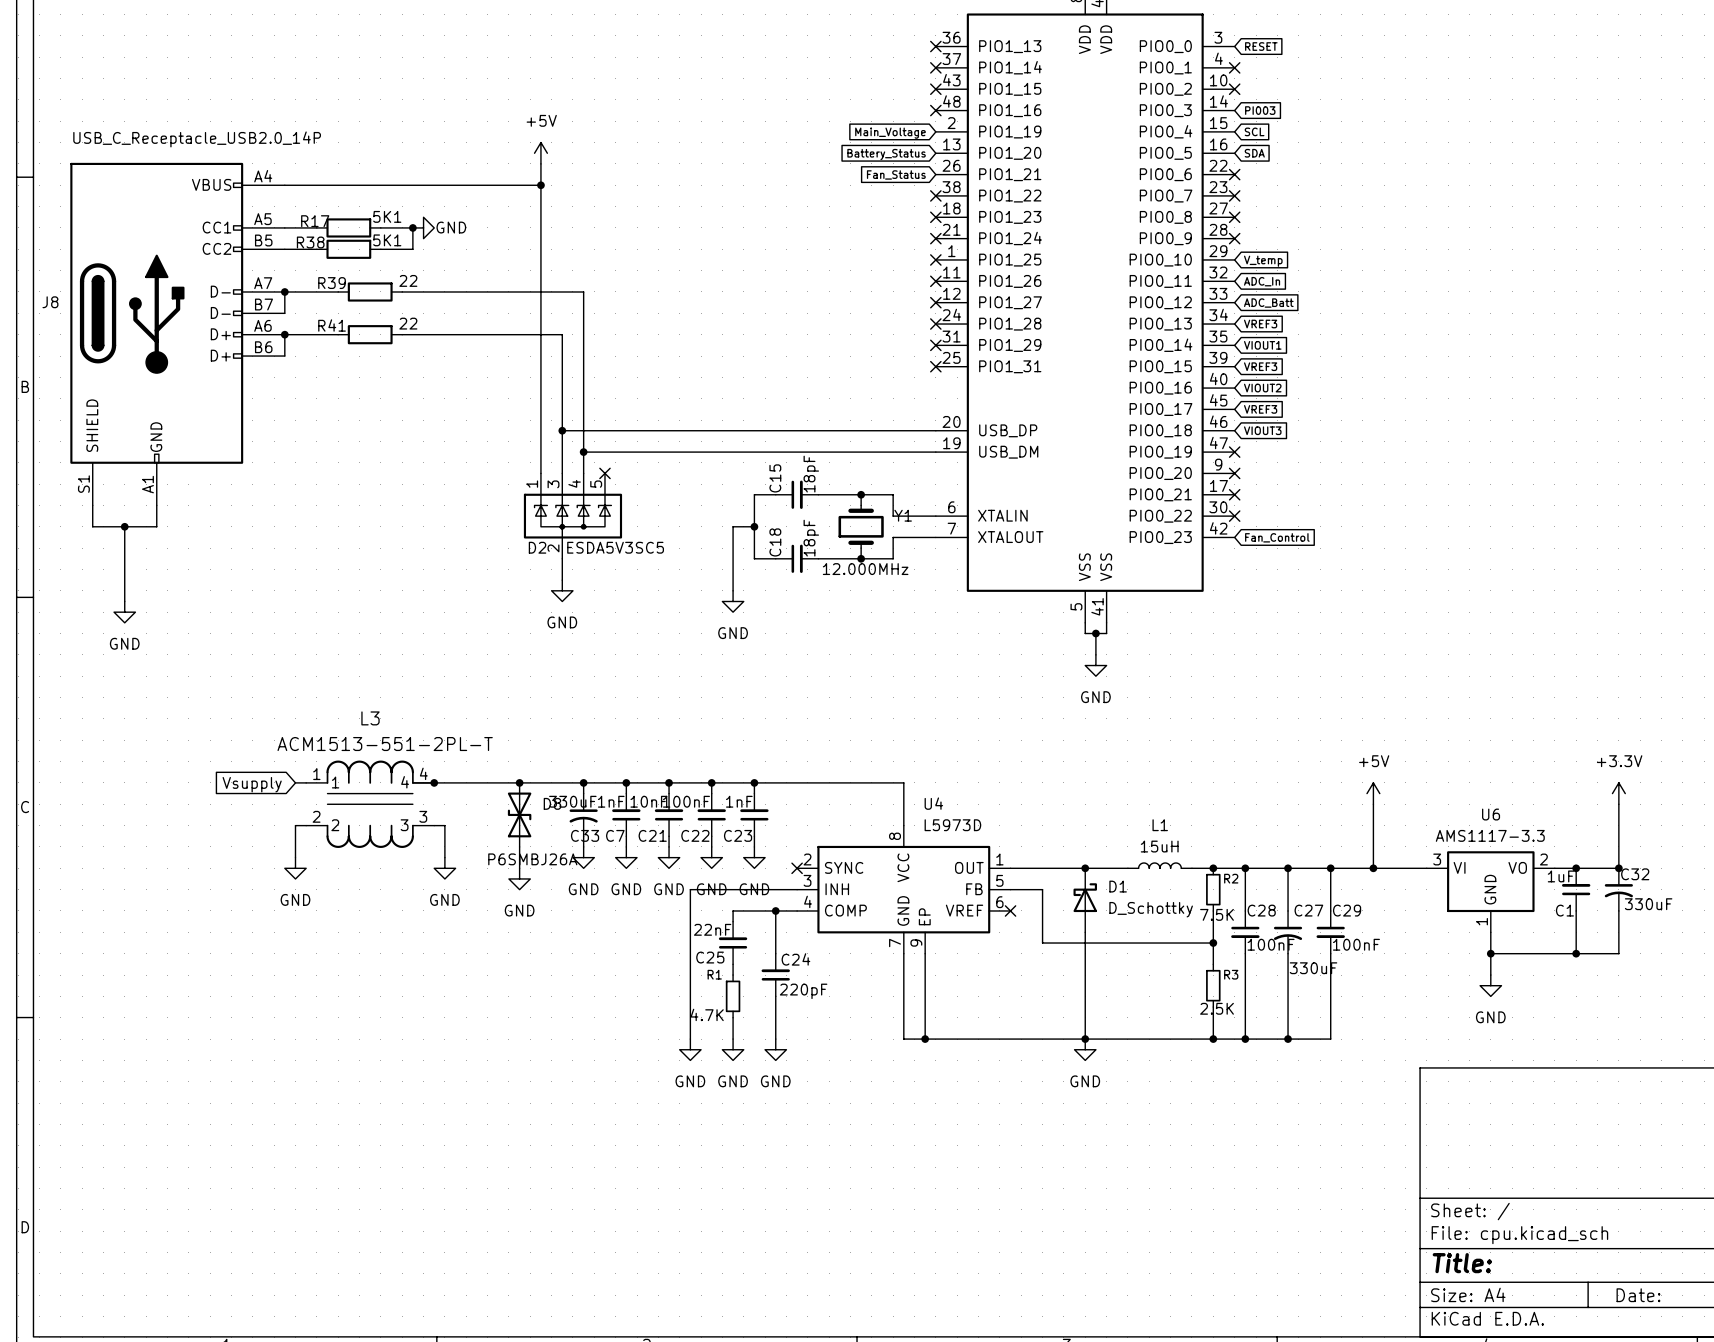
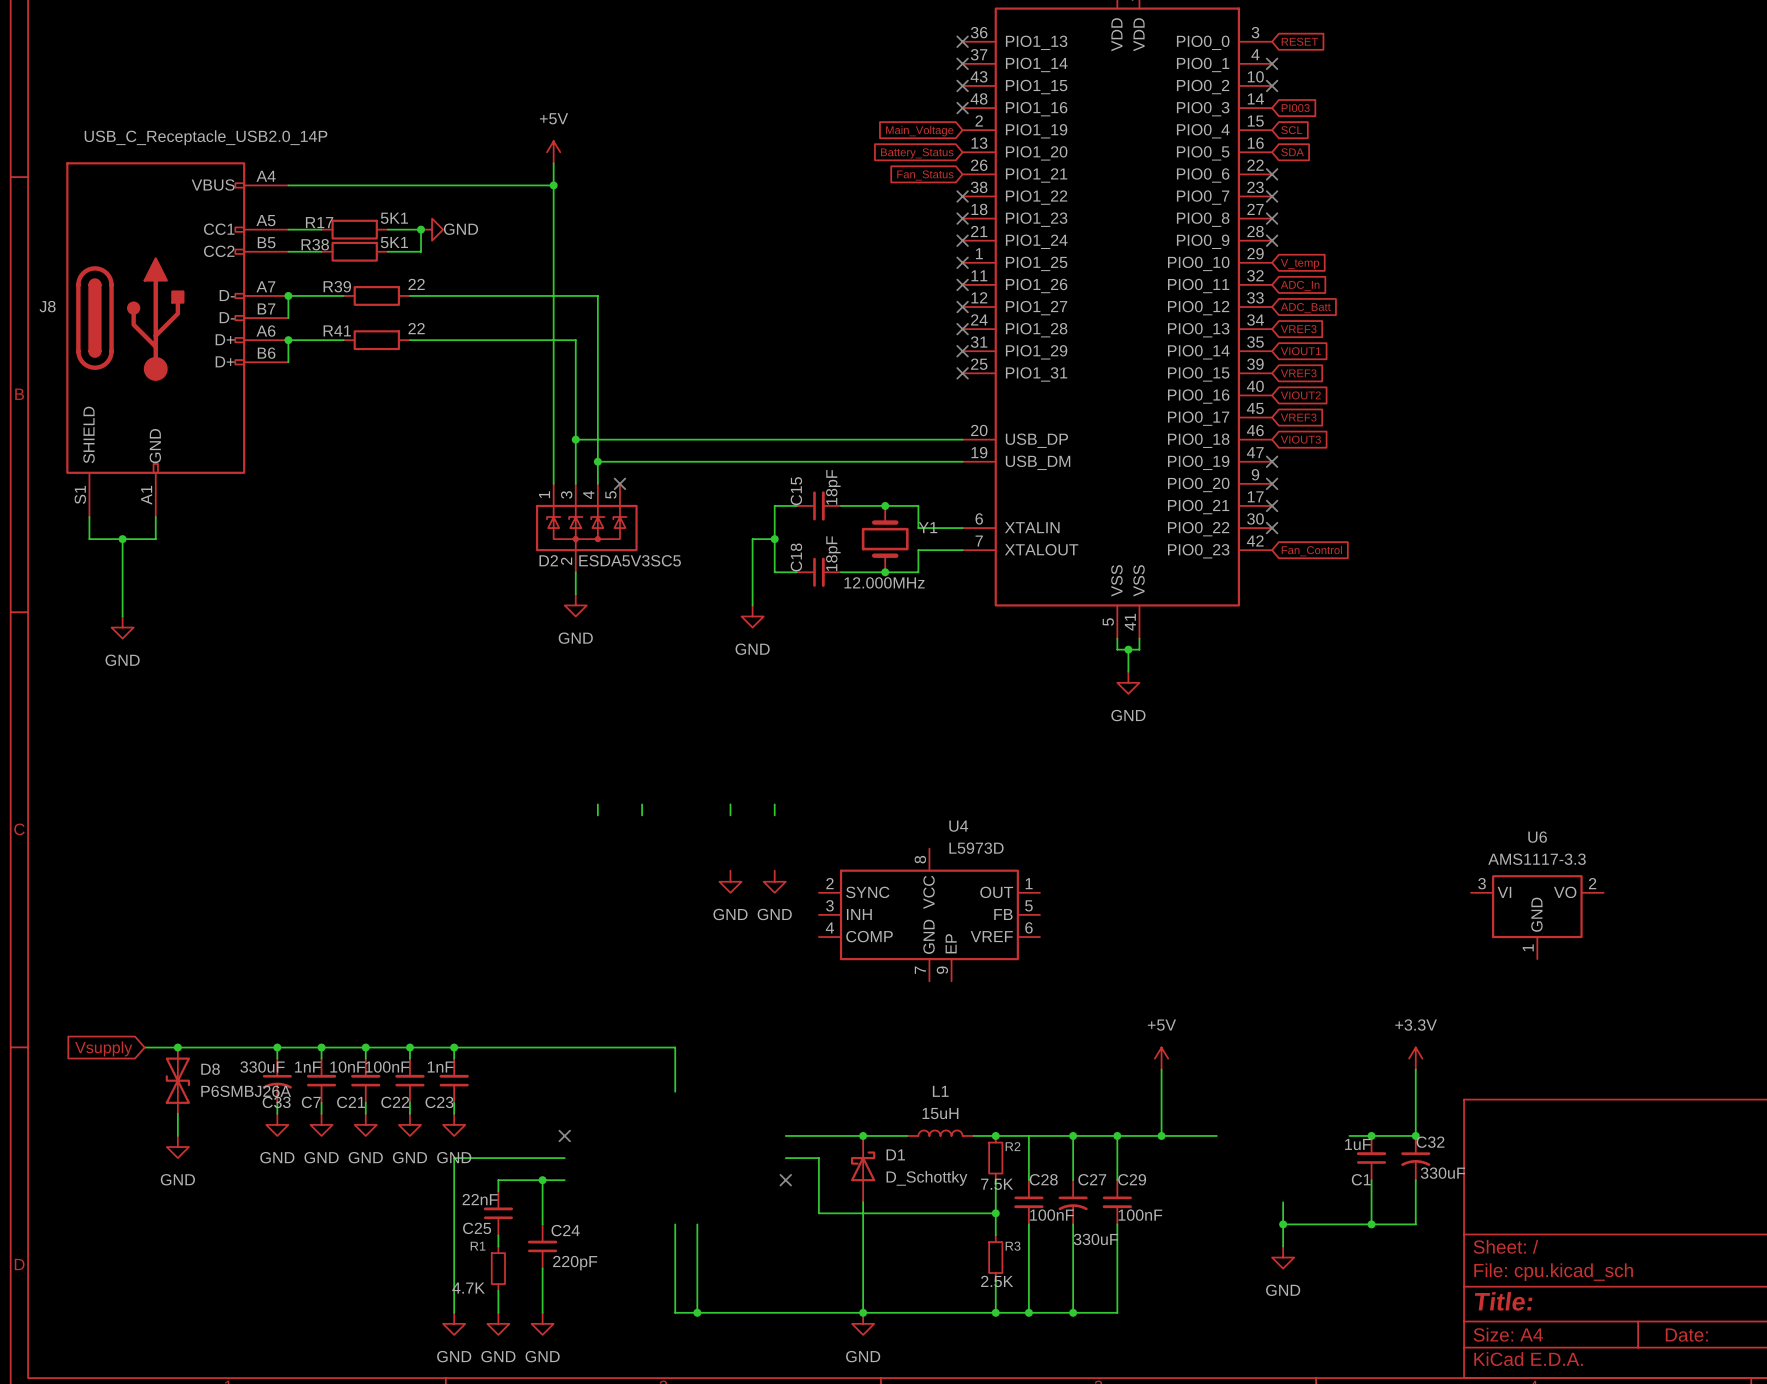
wire: (295, 782) (306, 782) -> none
wire: (412, 782) (903, 782) (903, 825) -> none
junction: (434, 782) -> none
junction: (519, 782) -> none
junction: (583, 782) -> none
junction: (626, 782) -> none
wire: (669, 782) (669, 793) -> none
junction: (669, 782) -> none
junction: (711, 782) -> none
junction: (754, 782) -> none
global label: Vsupply (252, 784) -> none
power symbol: +5V (1373, 793) -> none
power symbol: +3.3V (1618, 793) -> none
L3: ACM1513-551-2PL-T (370, 804) -> none
wire: (1373, 804) (1373, 868) -> none
wire: (1618, 804) (1618, 868) (1554, 868) -> none
D8 position: (519, 814) -> (177, 1080)
C33 position: (583, 814) -> (277, 1080)
C7 position: (626, 814) -> (321, 1080)
C21 position: (669, 814) -> (365, 1080)
C22 position: (711, 814) -> (409, 1080)
C23 position: (754, 814) -> (454, 1080)
wire: (306, 825) (295, 825) (295, 857) -> none
wire: (434, 825) (444, 825) (444, 857) -> none
wire: (583, 836) (583, 846) -> none
wire: (626, 836) (626, 846) -> none
wire: (669, 836) (669, 846) -> none
wire: (711, 836) (711, 846) -> none
wire: (754, 836) (754, 846) -> none
wire: (519, 846) (519, 868) -> none
power symbol: GND (583, 857) -> none
power symbol: GND (626, 857) -> none
power symbol: GND (669, 857) -> none
D8 value position: P6SMBJ26A (532, 859) -> P6SMBJ26A (246, 1091)
L1 position: (1159, 865) -> (940, 1133)
power symbol: GND (295, 868) -> none
power symbol: GND (444, 868) -> none
no-connect mark: (797, 868) -> none
wire: (1010, 868) (1127, 868) -> none
junction: (1085, 868) -> none
wire: (1191, 868) (1426, 868) -> none
junction: (1213, 868) -> none
wire: (1245, 868) (1245, 910) -> none
junction: (1245, 868) -> none
wire: (1288, 868) (1288, 910) -> none
junction: (1288, 868) -> none
wire: (1330, 868) (1330, 910) -> none
junction: (1330, 868) -> none
junction: (1373, 868) -> none
junction: (1576, 868) -> none
junction: (1618, 868) -> none
power symbol: GND (519, 878) -> none
wire: (797, 889) (690, 889) (690, 1039) -> none
wire: (1010, 889) (1042, 889) (1042, 943) (1213, 943) -> none
R2 position: (1213, 889) -> (995, 1158)
C1 position: (1576, 889) -> (1371, 1158)
C32 position: (1618, 889) -> (1415, 1158)
D1 position: (1085, 900) -> (863, 1169)
wire: (775, 910) (775, 953) -> none
junction: (775, 910) -> none
wire: (797, 910) (733, 910) (733, 921) -> none
no-connect mark: (1010, 910) -> none
wire: (1213, 910) (1213, 964) -> none
wire: (1576, 910) (1576, 953) -> none
wire: (1618, 910) (1618, 953) (1490, 953) -> none
wire: (1085, 932) (1085, 1039) -> none
C28 position: (1245, 932) -> (1028, 1202)
C27 position: (1288, 932) -> (1073, 1202)
C29 position: (1330, 932) -> (1117, 1202)
wire: (1490, 932) (1490, 975) -> none
C25 position: (733, 943) -> (498, 1213)
junction: (1213, 943) -> none
wire: (903, 953) (903, 1039) (1330, 1039) (1330, 953) -> none
wire: (925, 953) (925, 1039) -> none
wire: (1245, 953) (1245, 1039) -> none
wire: (1288, 953) (1288, 1039) -> none
junction: (1490, 953) -> none
junction: (1576, 953) -> none
wire: (733, 964) (733, 975) -> none
C24 position: (775, 975) -> (542, 1246)
R3 position: (1213, 985) -> (995, 1257)
power symbol: GND (1490, 985) -> none
R1 position: (733, 996) -> (498, 1268)
wire: (775, 996) (775, 1039) -> none
wire: (1213, 1007) (1213, 1039) -> none
wire: none -> (144, 1047) (675, 1047) (675, 1091)
junction: none -> (177, 1047)
wire: none -> (277, 1047) (277, 1058)
junction: none -> (277, 1047)
wire: none -> (321, 1047) (321, 1058)
junction: none -> (321, 1047)
wire: none -> (365, 1047) (365, 1058)
junction: none -> (365, 1047)
wire: none -> (409, 1047) (409, 1058)
junction: none -> (409, 1047)
wire: none -> (454, 1047) (454, 1058)
junction: none -> (454, 1047)
wire: (733, 1017) (733, 1039) -> none
global label: none -> Vsupply (103, 1048)
power symbol: none -> +5V (1161, 1058)
power symbol: none -> +3.3V (1415, 1058)
junction: (925, 1039) -> none
junction: (1085, 1039) -> none
wire: none -> (1161, 1069) (1161, 1135)
junction: (1213, 1039) -> none
junction: (1245, 1039) -> none
junction: (1288, 1039) -> none
wire: none -> (1415, 1069) (1415, 1135) (1349, 1135)
power symbol: GND (690, 1049) -> none
power symbol: GND (733, 1049) -> none
power symbol: GND (775, 1049) -> none
power symbol: GND (1085, 1049) -> none
wire: none -> (277, 1102) (277, 1113)
wire: none -> (321, 1102) (321, 1113)
wire: none -> (365, 1102) (365, 1113)
wire: none -> (409, 1102) (409, 1113)
wire: none -> (454, 1102) (454, 1113)
wire: none -> (177, 1113) (177, 1135)
power symbol: none -> GND (277, 1124)
power symbol: none -> GND (321, 1124)
power symbol: none -> GND (365, 1124)
power symbol: none -> GND (409, 1124)
power symbol: none -> GND (454, 1124)
no-connect mark: none -> (564, 1135)
wire: none -> (785, 1135) (907, 1135)
junction: none -> (863, 1135)
wire: none -> (973, 1135) (1216, 1135)
junction: none -> (995, 1135)
wire: none -> (1028, 1135) (1028, 1180)
wire: none -> (1073, 1135) (1073, 1180)
junction: none -> (1073, 1135)
wire: none -> (1117, 1135) (1117, 1180)
junction: none -> (1117, 1135)
junction: none -> (1161, 1135)
junction: none -> (1371, 1135)
junction: none -> (1415, 1135)
power symbol: none -> GND (177, 1147)
wire: none -> (564, 1158) (454, 1158) (454, 1312)
wire: none -> (785, 1158) (818, 1158) (818, 1213) (995, 1213)
wire: none -> (542, 1180) (542, 1224)
junction: none -> (542, 1180)
wire: none -> (564, 1180) (498, 1180) (498, 1191)
no-connect mark: none -> (785, 1180)
wire: none -> (995, 1180) (995, 1235)
wire: none -> (1371, 1180) (1371, 1224)
wire: none -> (1415, 1180) (1415, 1224) (1283, 1224)
wire: none -> (863, 1202) (863, 1312)
wire: none -> (1283, 1202) (1283, 1246)
junction: none -> (995, 1213)
wire: none -> (675, 1224) (675, 1312) (1117, 1312) (1117, 1224)
wire: none -> (697, 1224) (697, 1312)
wire: none -> (1028, 1224) (1028, 1312)
wire: none -> (1073, 1224) (1073, 1312)
junction: none -> (1283, 1224)
junction: none -> (1371, 1224)
wire: none -> (498, 1235) (498, 1246)
power symbol: none -> GND (1283, 1257)
wire: none -> (542, 1268) (542, 1312)
wire: none -> (995, 1279) (995, 1312)
wire: none -> (498, 1290) (498, 1312)
junction: none -> (697, 1312)
junction: none -> (863, 1312)
junction: none -> (995, 1312)
junction: none -> (1028, 1312)
junction: none -> (1073, 1312)
power symbol: none -> GND (454, 1323)
power symbol: none -> GND (498, 1323)
power symbol: none -> GND (542, 1323)
power symbol: none -> GND (863, 1323)

